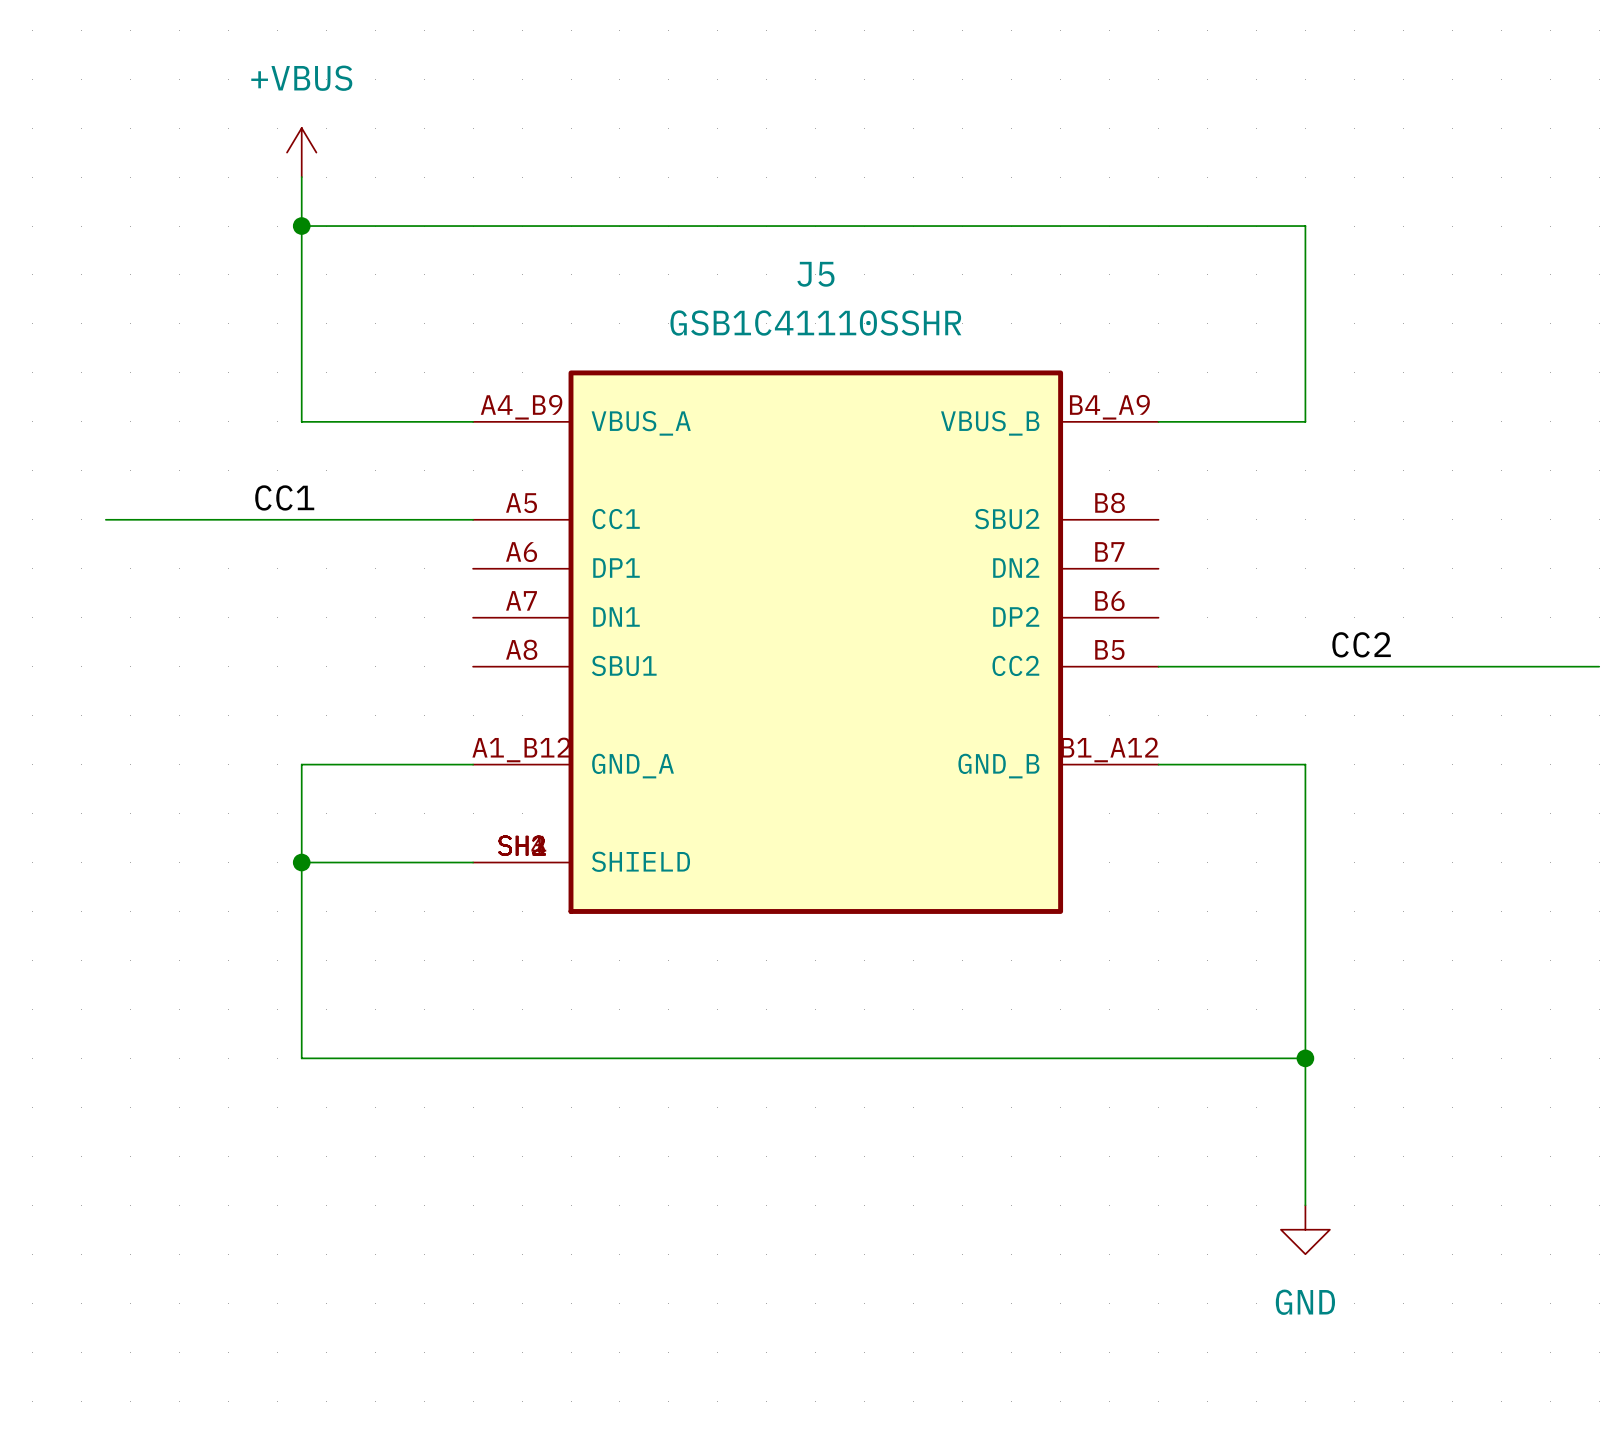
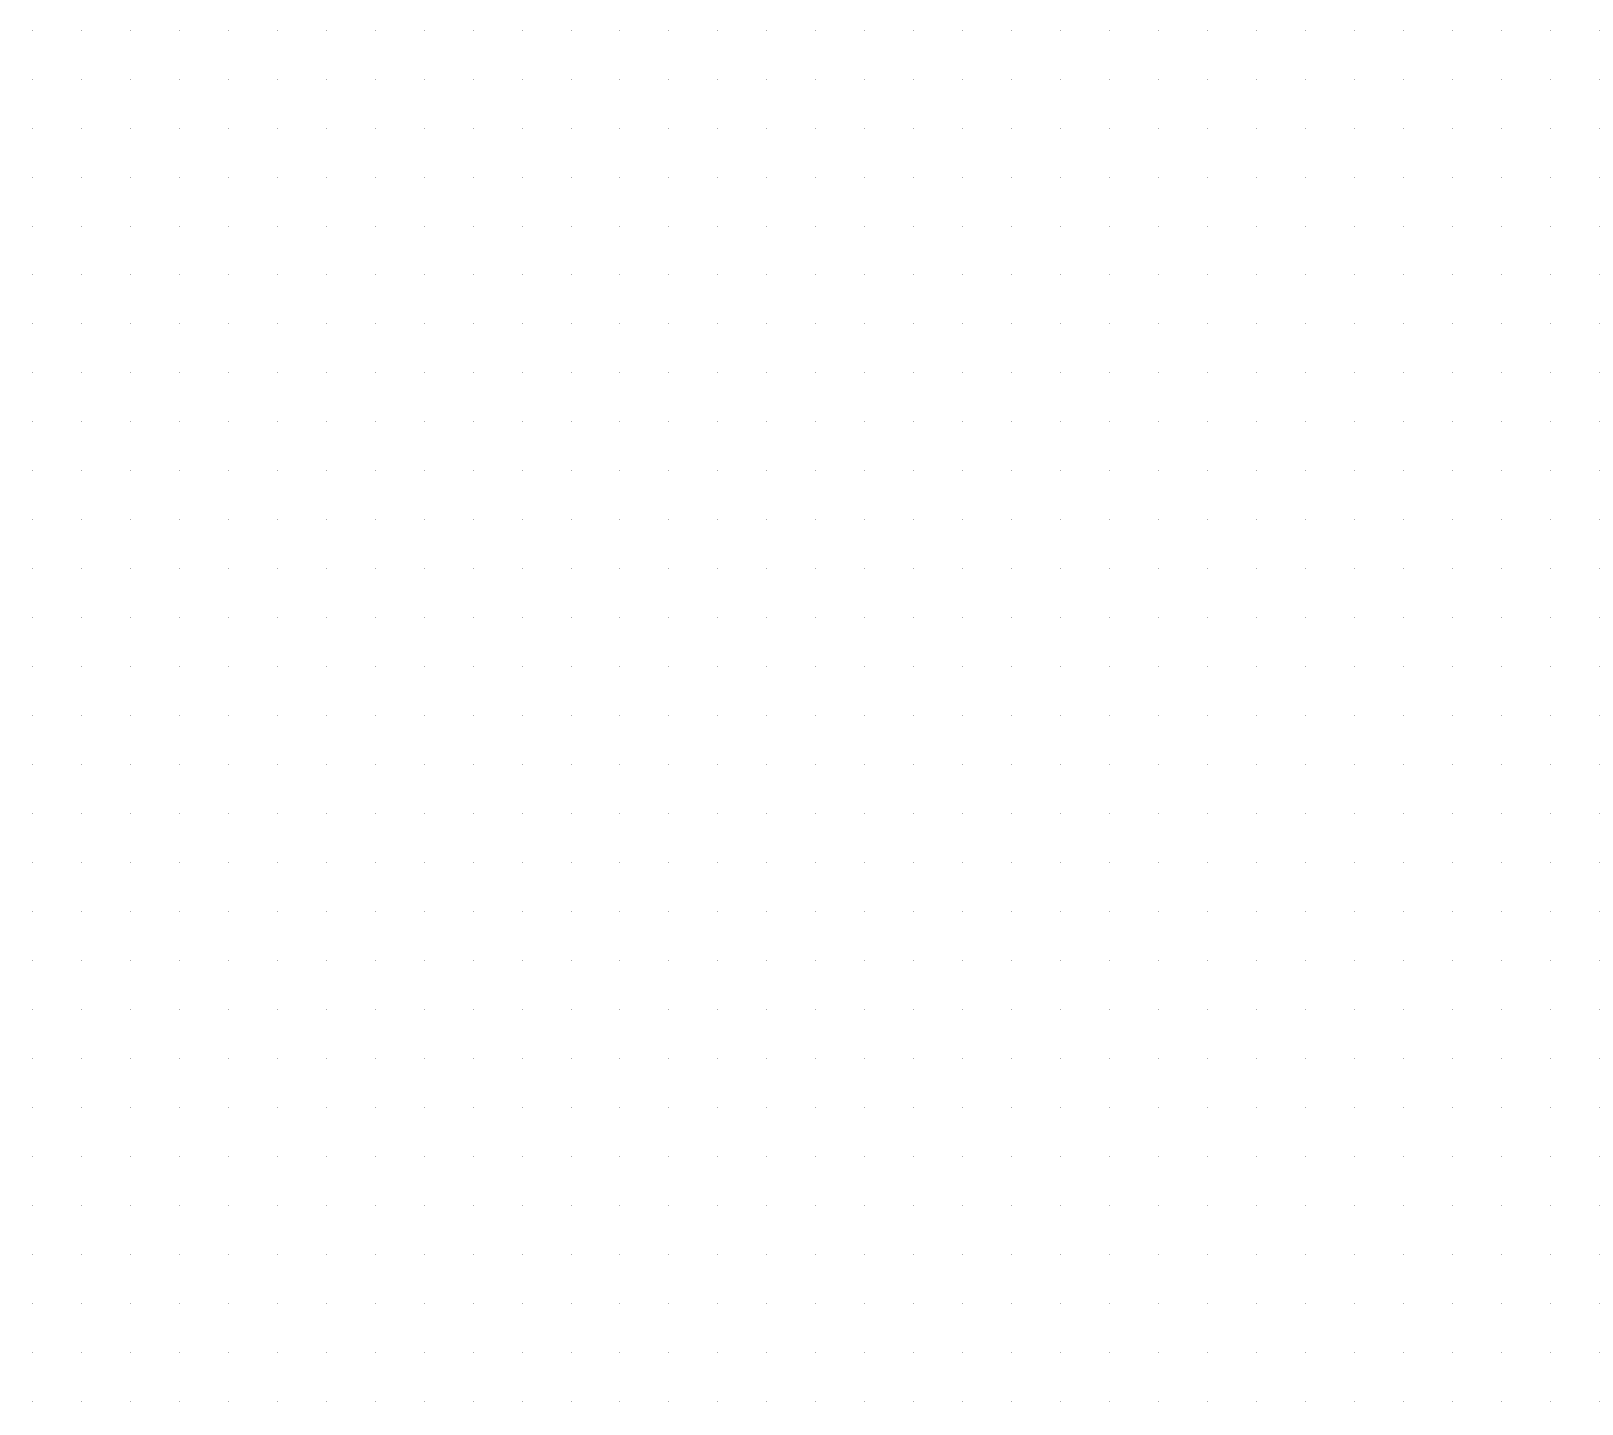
power symbol: +VBUS (301, 152) -> none
wire: (301, 177) (301, 421) (473, 421) -> none
wire: (301, 226) (1305, 226) (1305, 421) (1158, 421) -> none
junction: (301, 226) -> none
label: CC1 (284, 497) -> none
wire: (105, 519) (473, 519) -> none
J5: GSB1C41110SSHR (815, 642) -> none
label: CC2 (1361, 644) -> none
wire: (1158, 666) (1599, 666) -> none
wire: (473, 764) (301, 764) (301, 1058) (1305, 1058) -> none
wire: (1158, 764) (1305, 764) (1305, 1205) -> none
wire: (301, 862) (473, 862) -> none
junction: (301, 862) -> none
junction: (1305, 1058) -> none
power symbol: GND (1305, 1229) -> none

